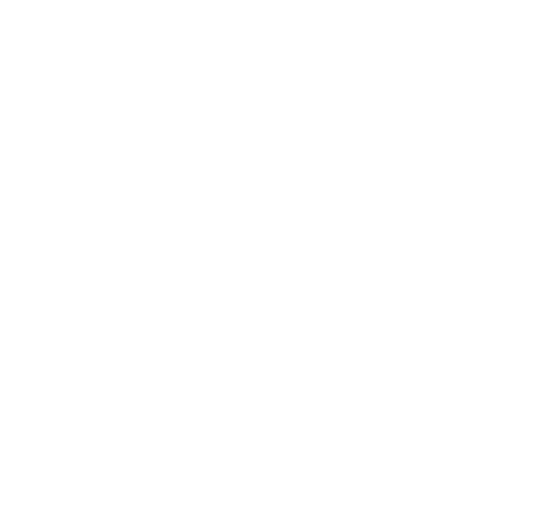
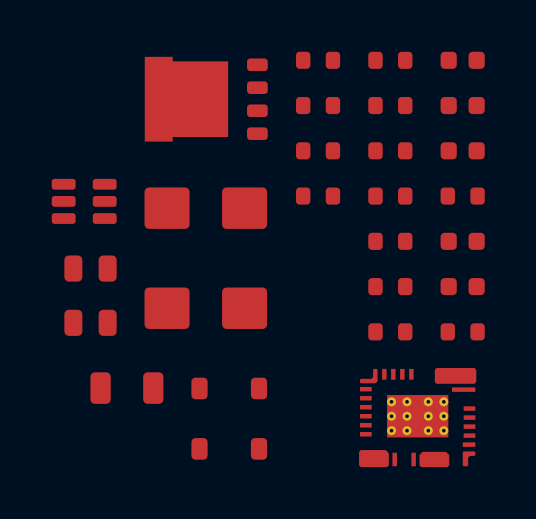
part: none -> (318, 60)
part: none -> (390, 60)
part: none -> (462, 60)
part: none -> (206, 99)
part: none -> (318, 105)
part: none -> (390, 105)
part: none -> (462, 105)
part: none -> (318, 150)
part: none -> (390, 150)
part: none -> (462, 150)
part: none -> (318, 196)
part: none -> (390, 196)
part: none -> (462, 196)
part: none -> (84, 201)
part: none -> (205, 208)
part: none -> (390, 241)
part: none -> (462, 241)
part: none -> (90, 268)
part: none -> (390, 286)
part: none -> (462, 286)
part: none -> (205, 308)
part: none -> (90, 322)
part: none -> (390, 331)
part: none -> (462, 331)
part: none -> (126, 388)
part: none -> (229, 388)
part: none -> (417, 417)
part: none -> (229, 448)

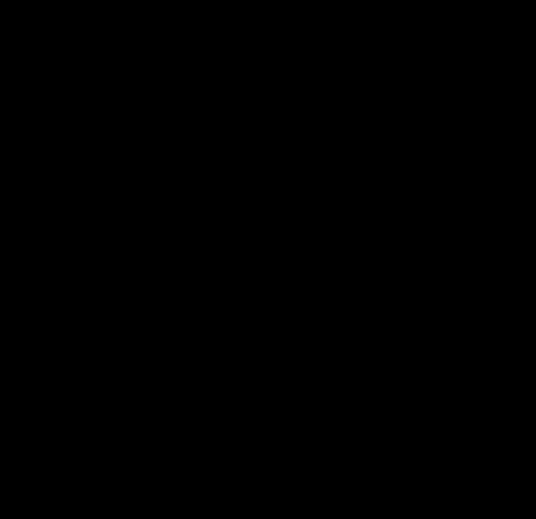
part: (318, 60) -> none
part: (390, 60) -> none
part: (462, 60) -> none
part: (206, 99) -> none
part: (318, 105) -> none
part: (390, 105) -> none
part: (462, 105) -> none
part: (318, 150) -> none
part: (390, 150) -> none
part: (462, 150) -> none
part: (318, 196) -> none
part: (390, 196) -> none
part: (462, 196) -> none
part: (84, 201) -> none
part: (205, 208) -> none
part: (390, 241) -> none
part: (462, 241) -> none
part: (90, 268) -> none
part: (390, 286) -> none
part: (462, 286) -> none
part: (205, 308) -> none
part: (90, 322) -> none
part: (390, 331) -> none
part: (462, 331) -> none
part: (126, 388) -> none
part: (229, 388) -> none
part: (417, 417) -> none
part: (229, 448) -> none

